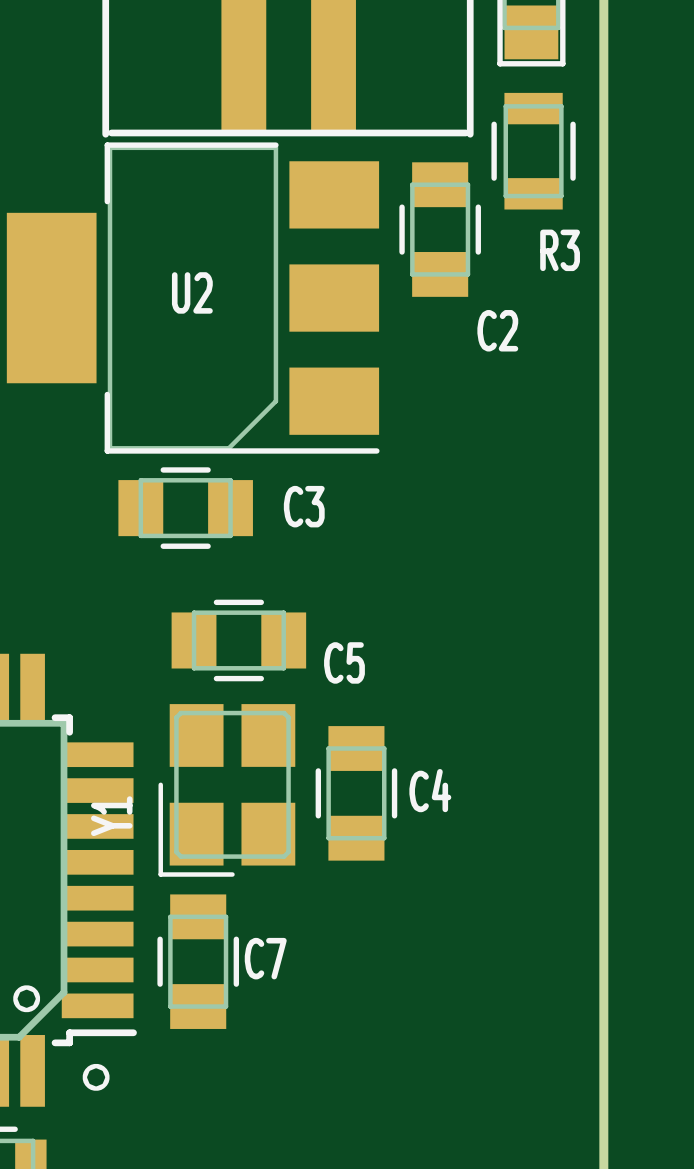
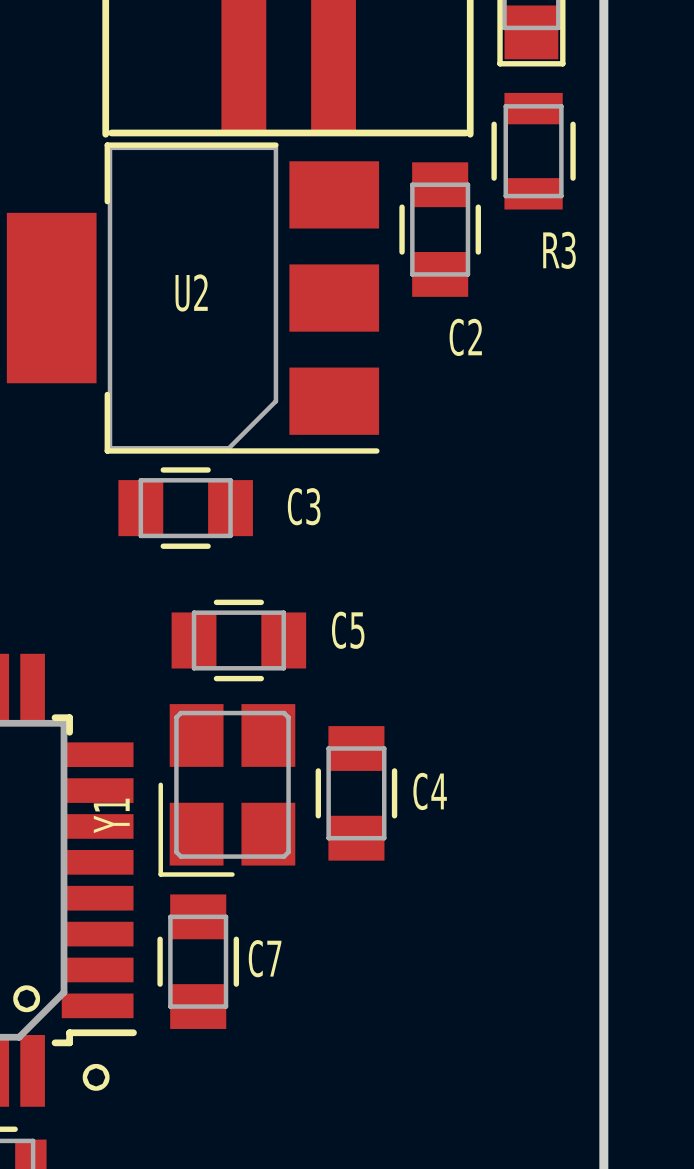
C2 name position: C2 (497, 330) -> C2 (465, 337)
C5 name position: C5 (344, 662) -> C5 (348, 630)

